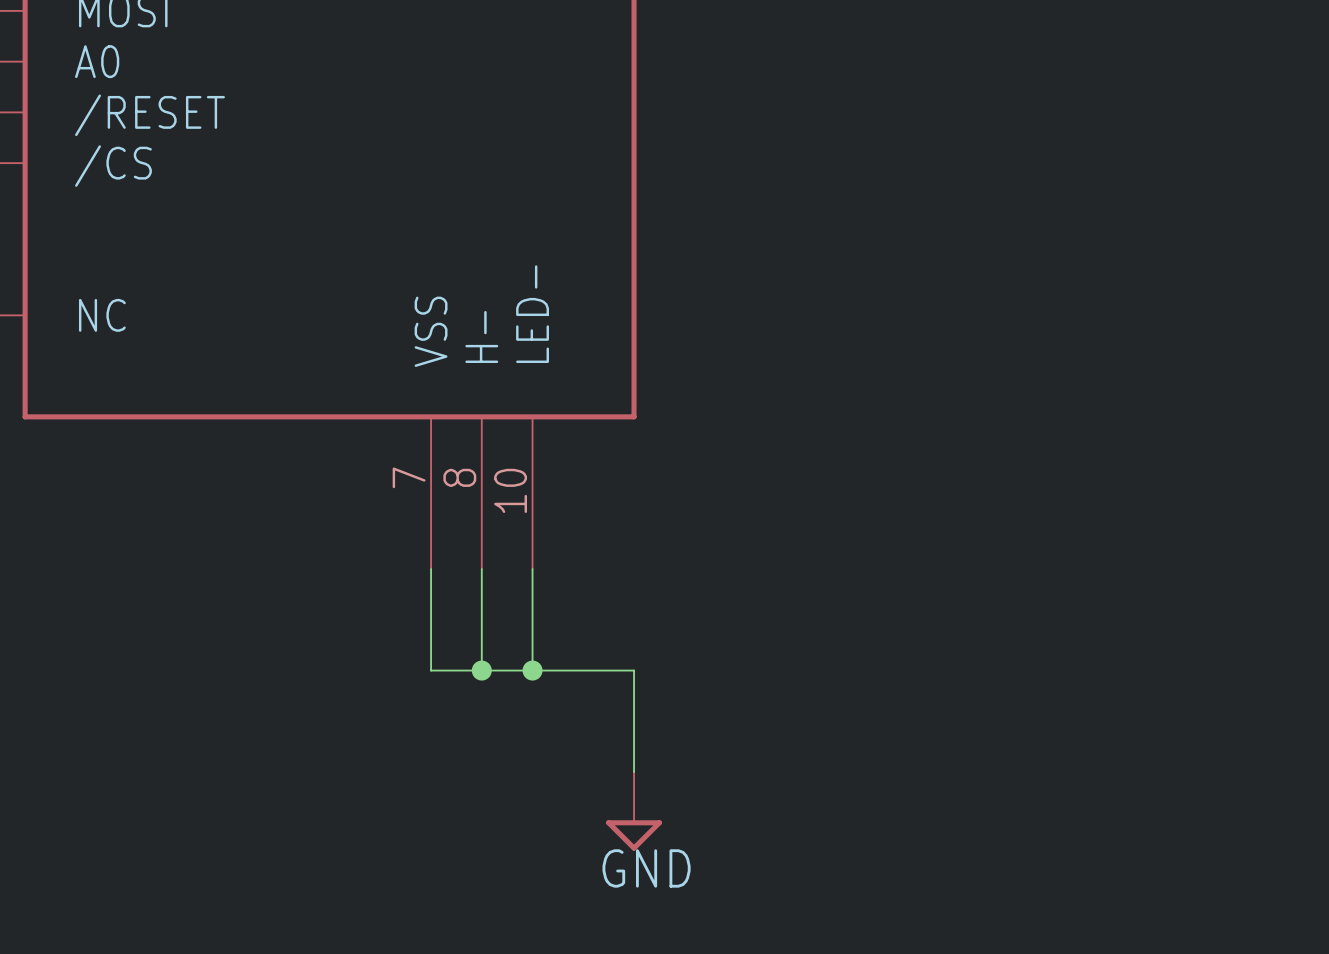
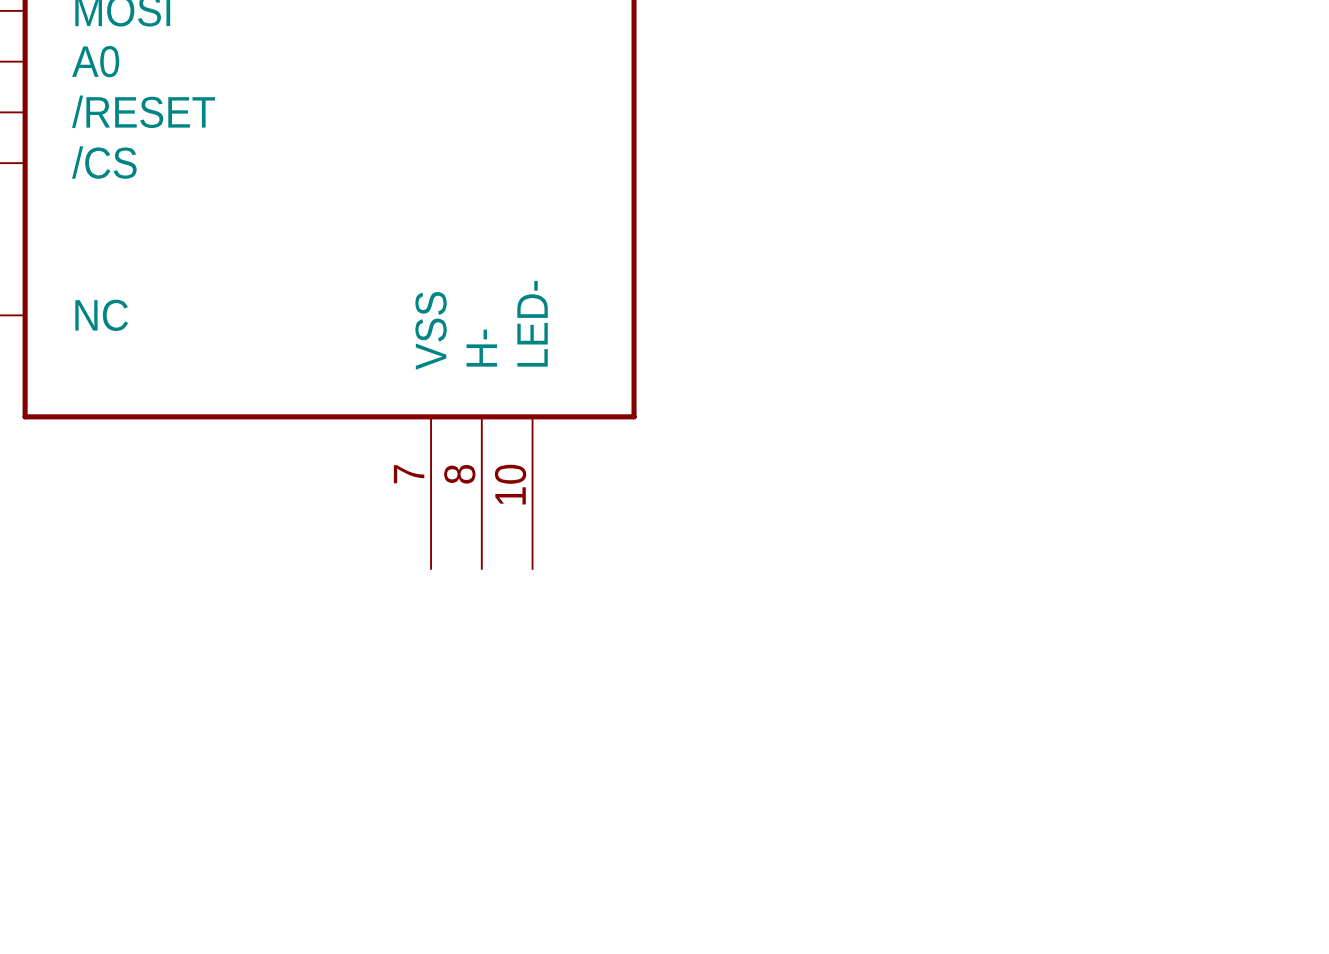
wire: (431, 569) (431, 670) (634, 670) (634, 772) -> none
wire: (481, 569) (481, 670) -> none
wire: (532, 569) (532, 670) -> none
junction: (481, 670) -> none
junction: (532, 670) -> none
power symbol: GND (634, 811) -> none

